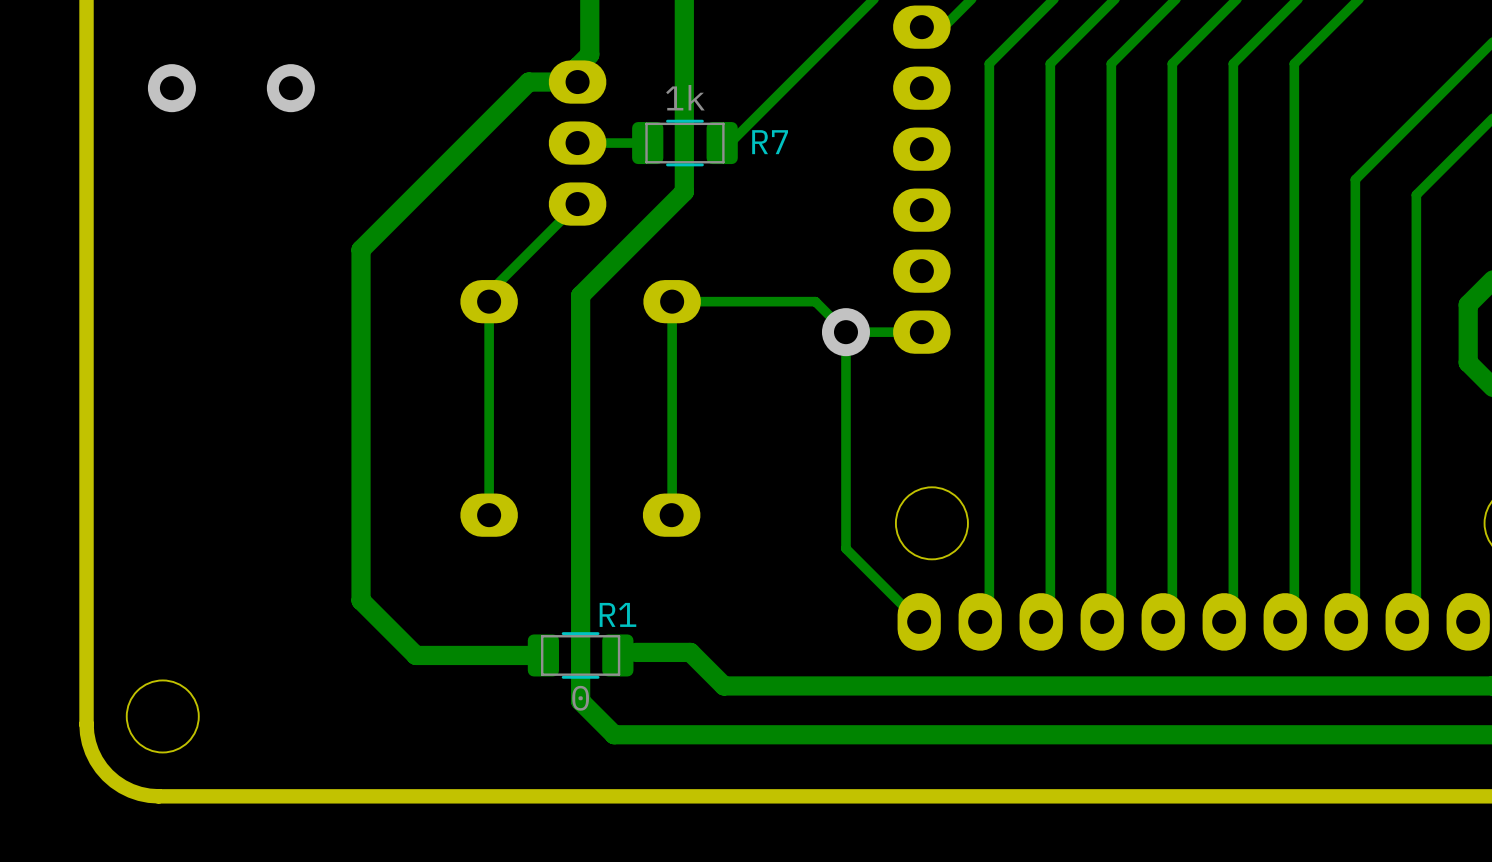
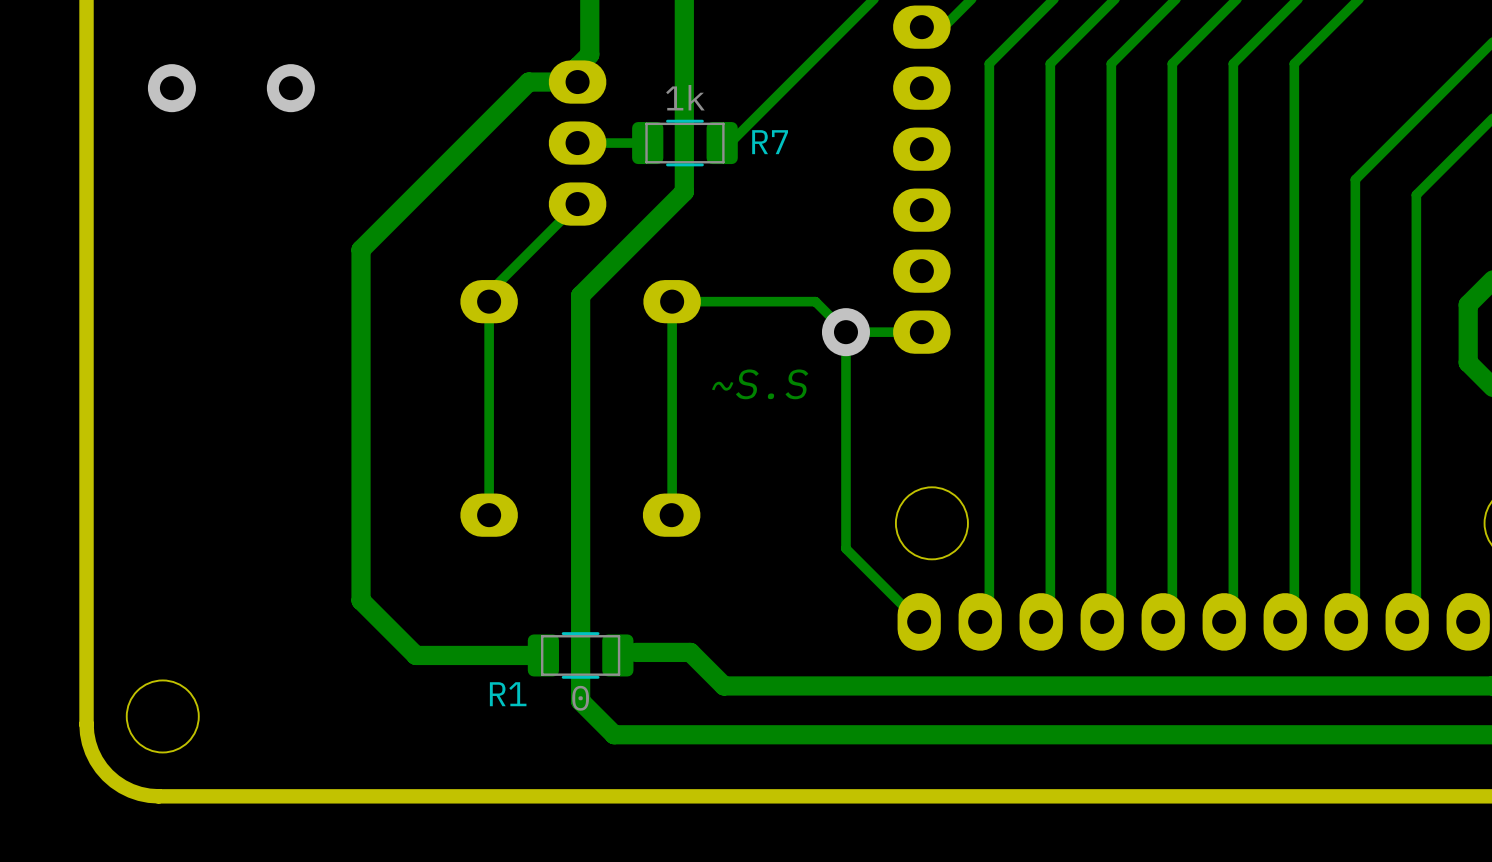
text: none -> ~S.S (760, 384)
R1 name position: R1 (617, 614) -> R1 (508, 694)

